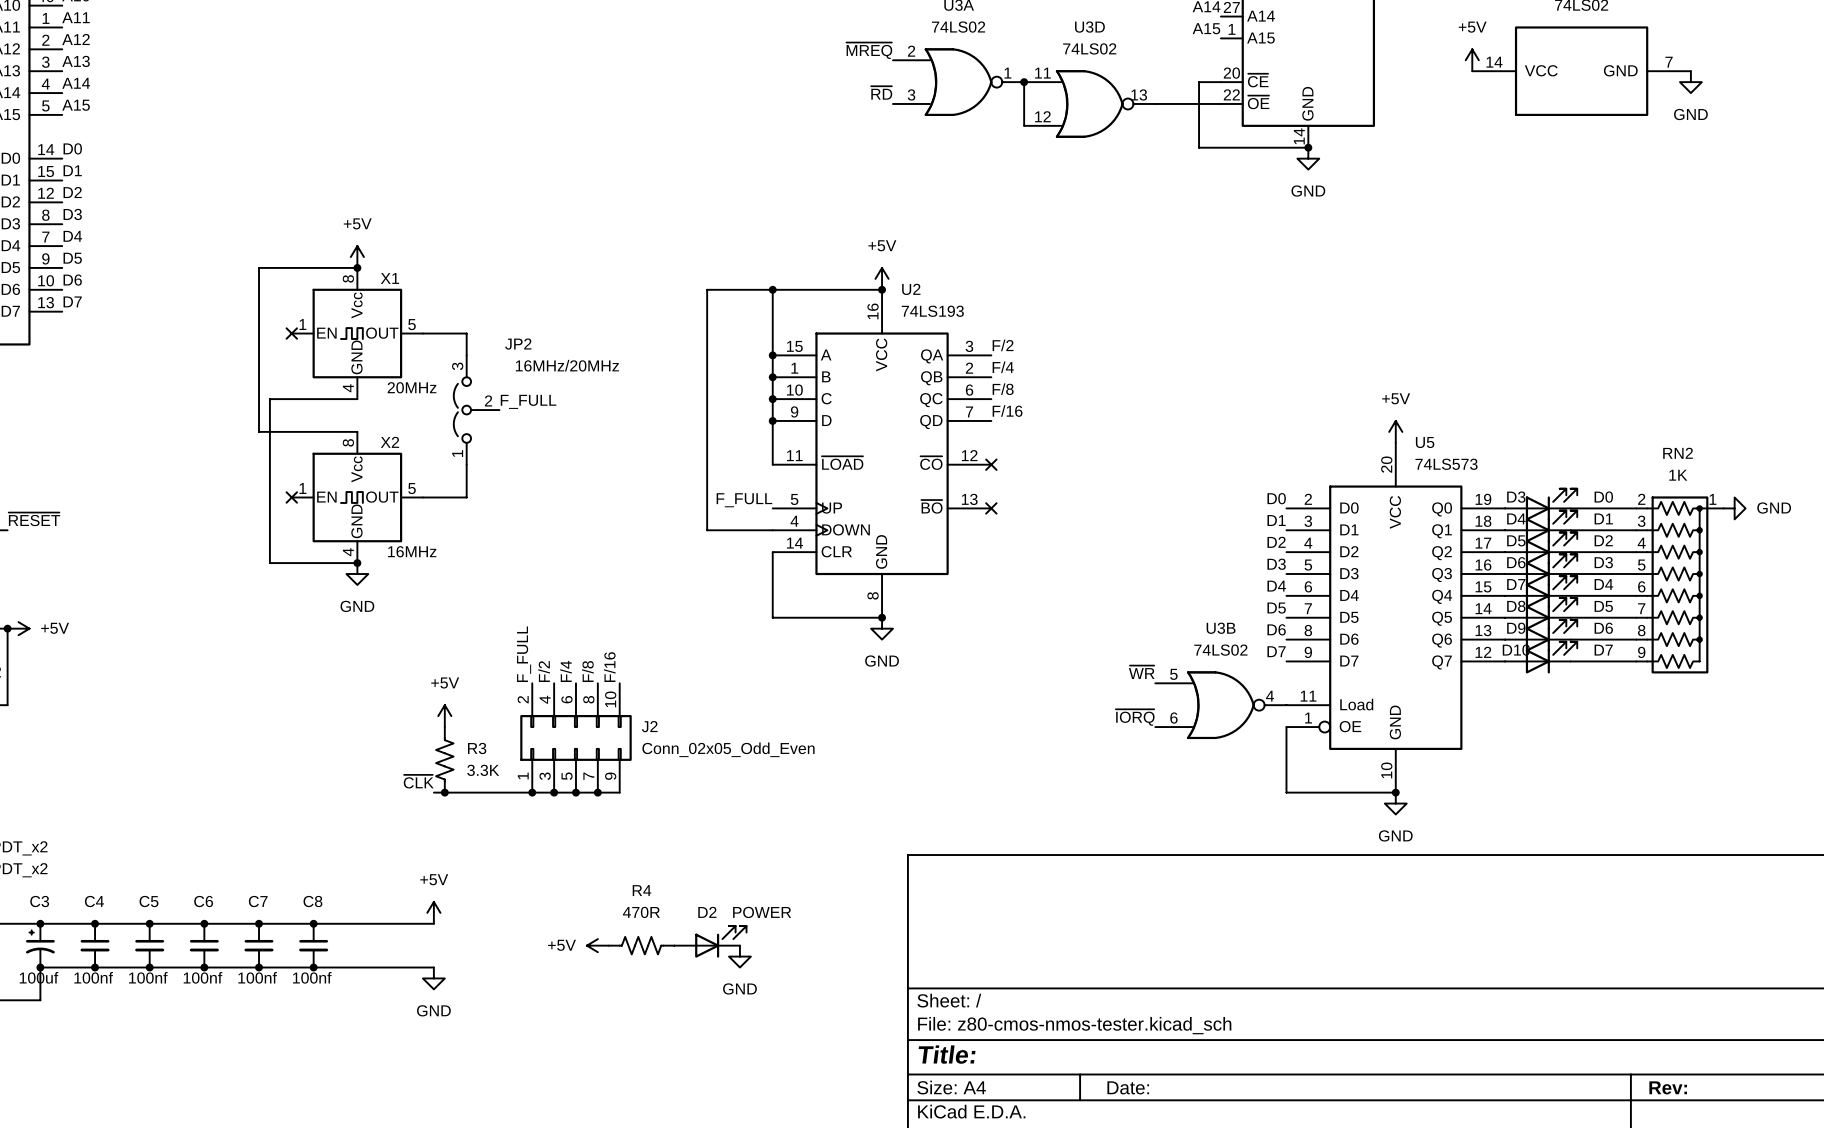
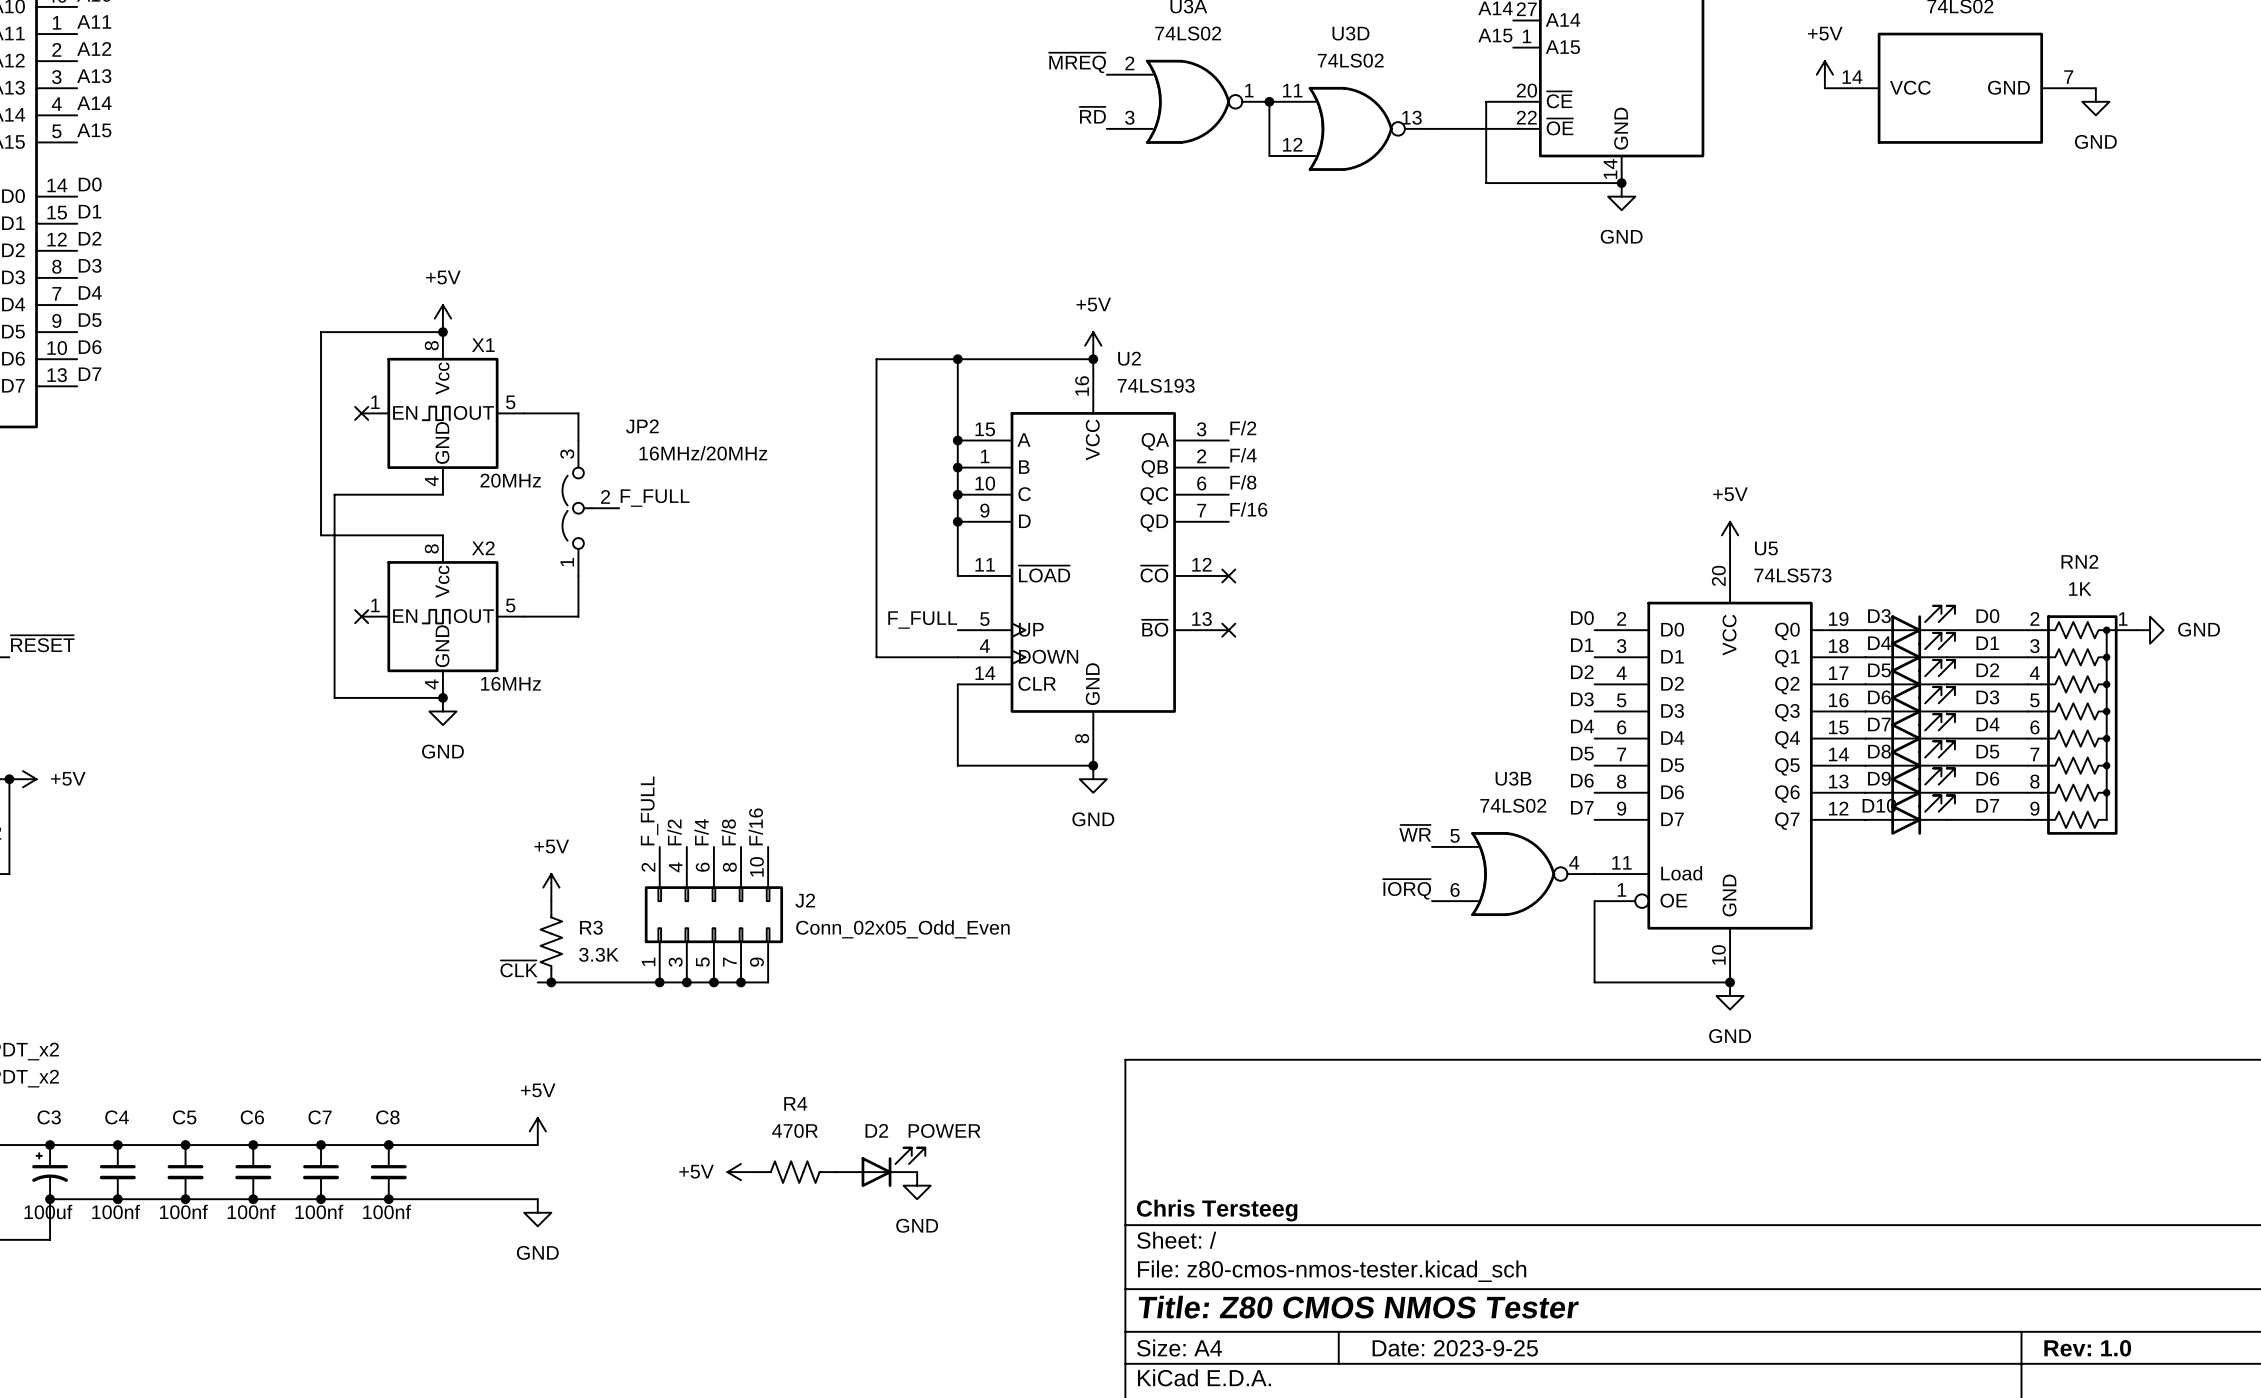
title block: none -> Chris Tersteeg (1217, 1210)
title block: Title: (947, 1054) -> Title: Z80 CMOS NMOS Tester (1358, 1307)
title block: Date: (1128, 1087) -> Date: 2023-9-25 (1455, 1348)
title block: Rev: (1668, 1087) -> Rev: 1.0 (2087, 1348)

